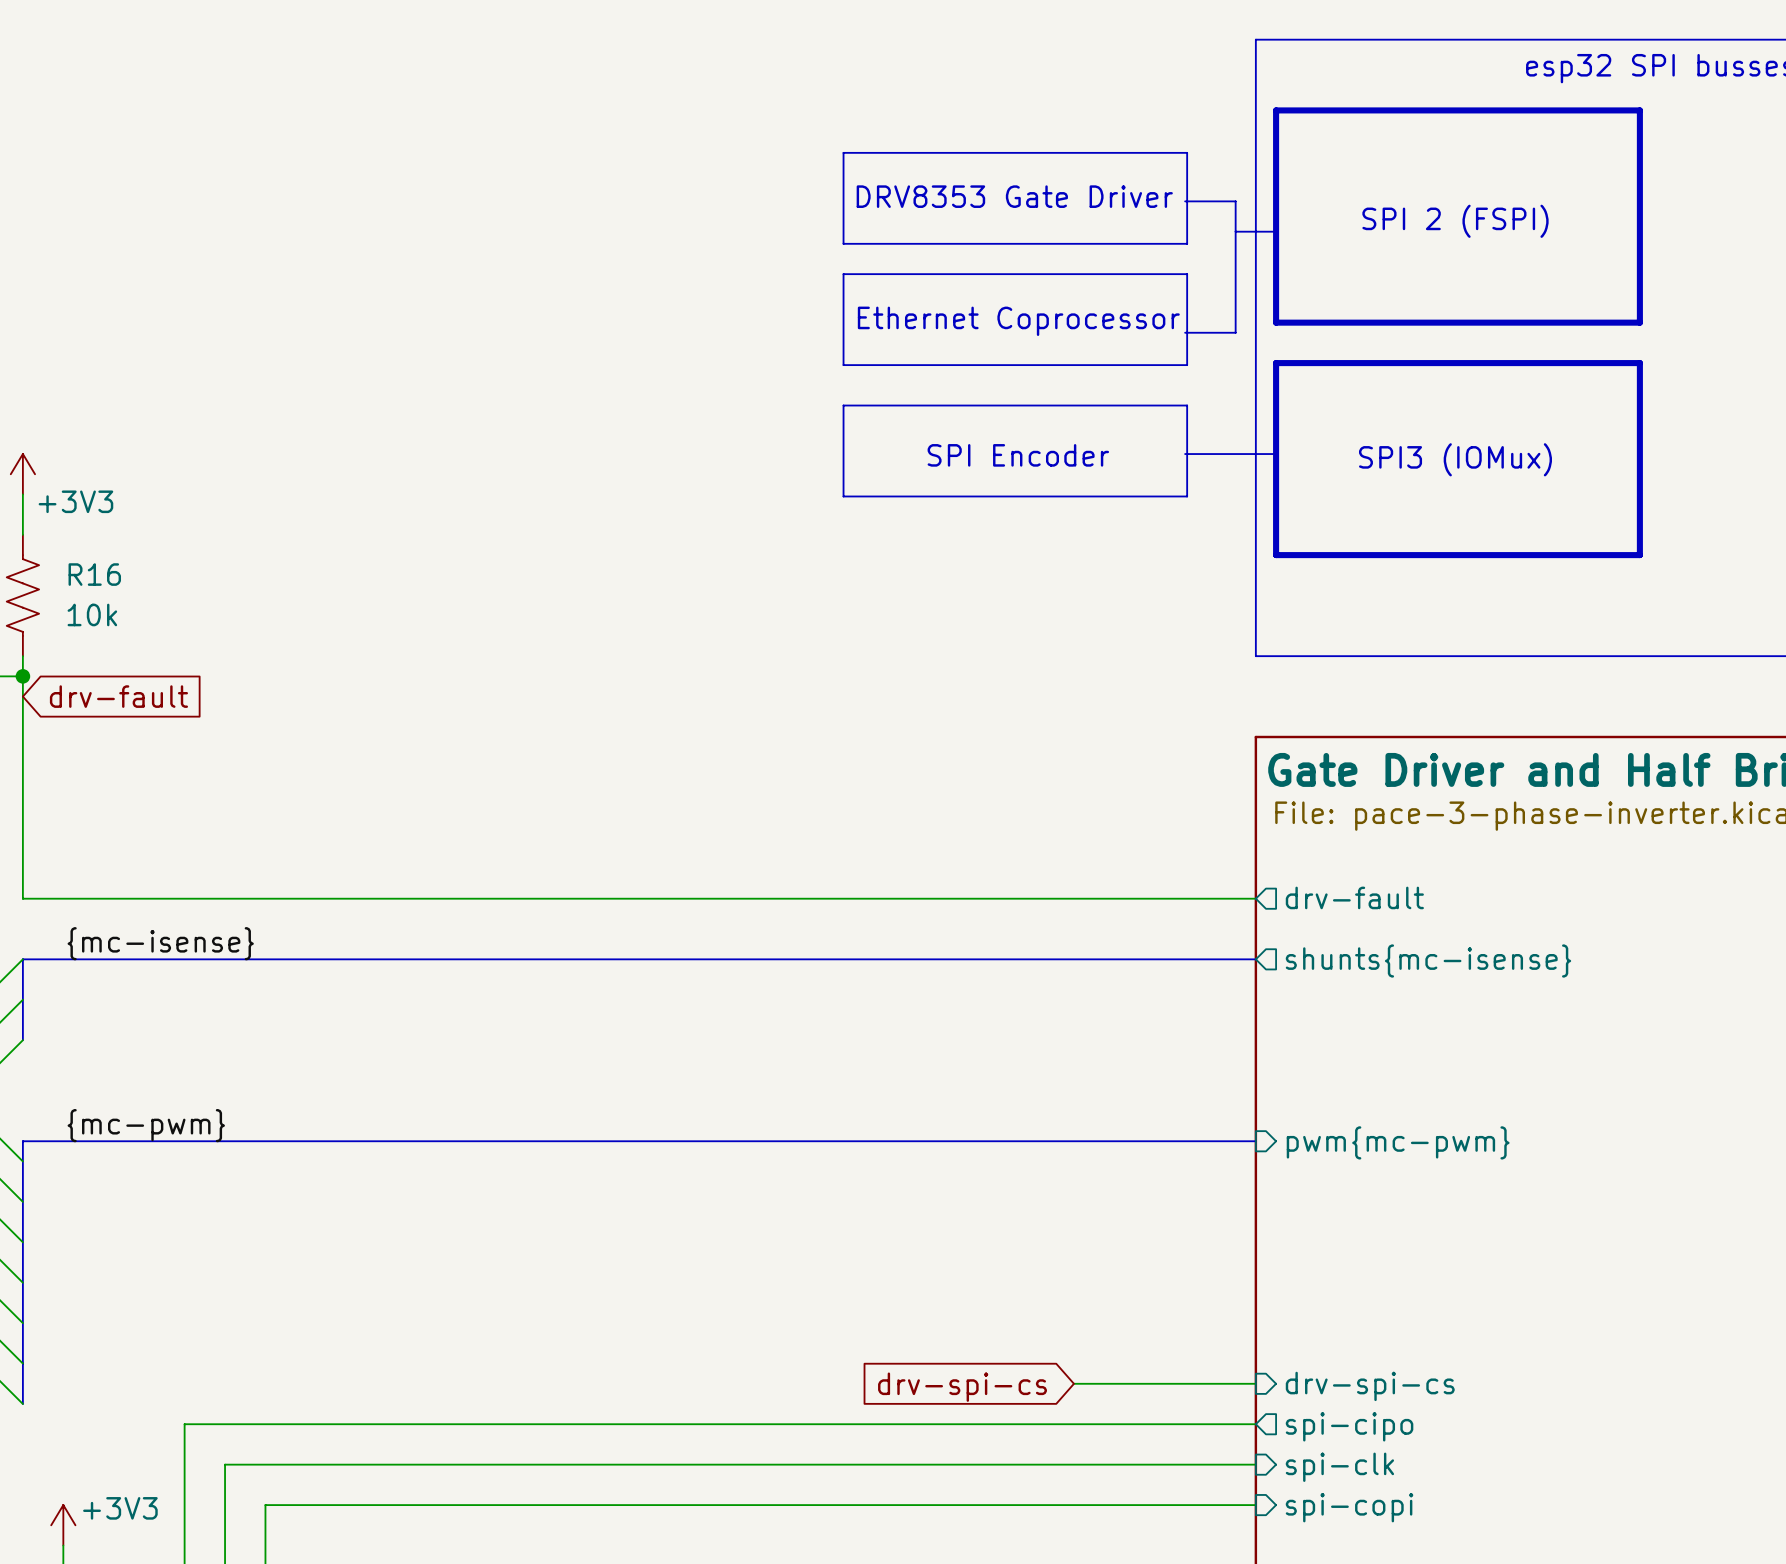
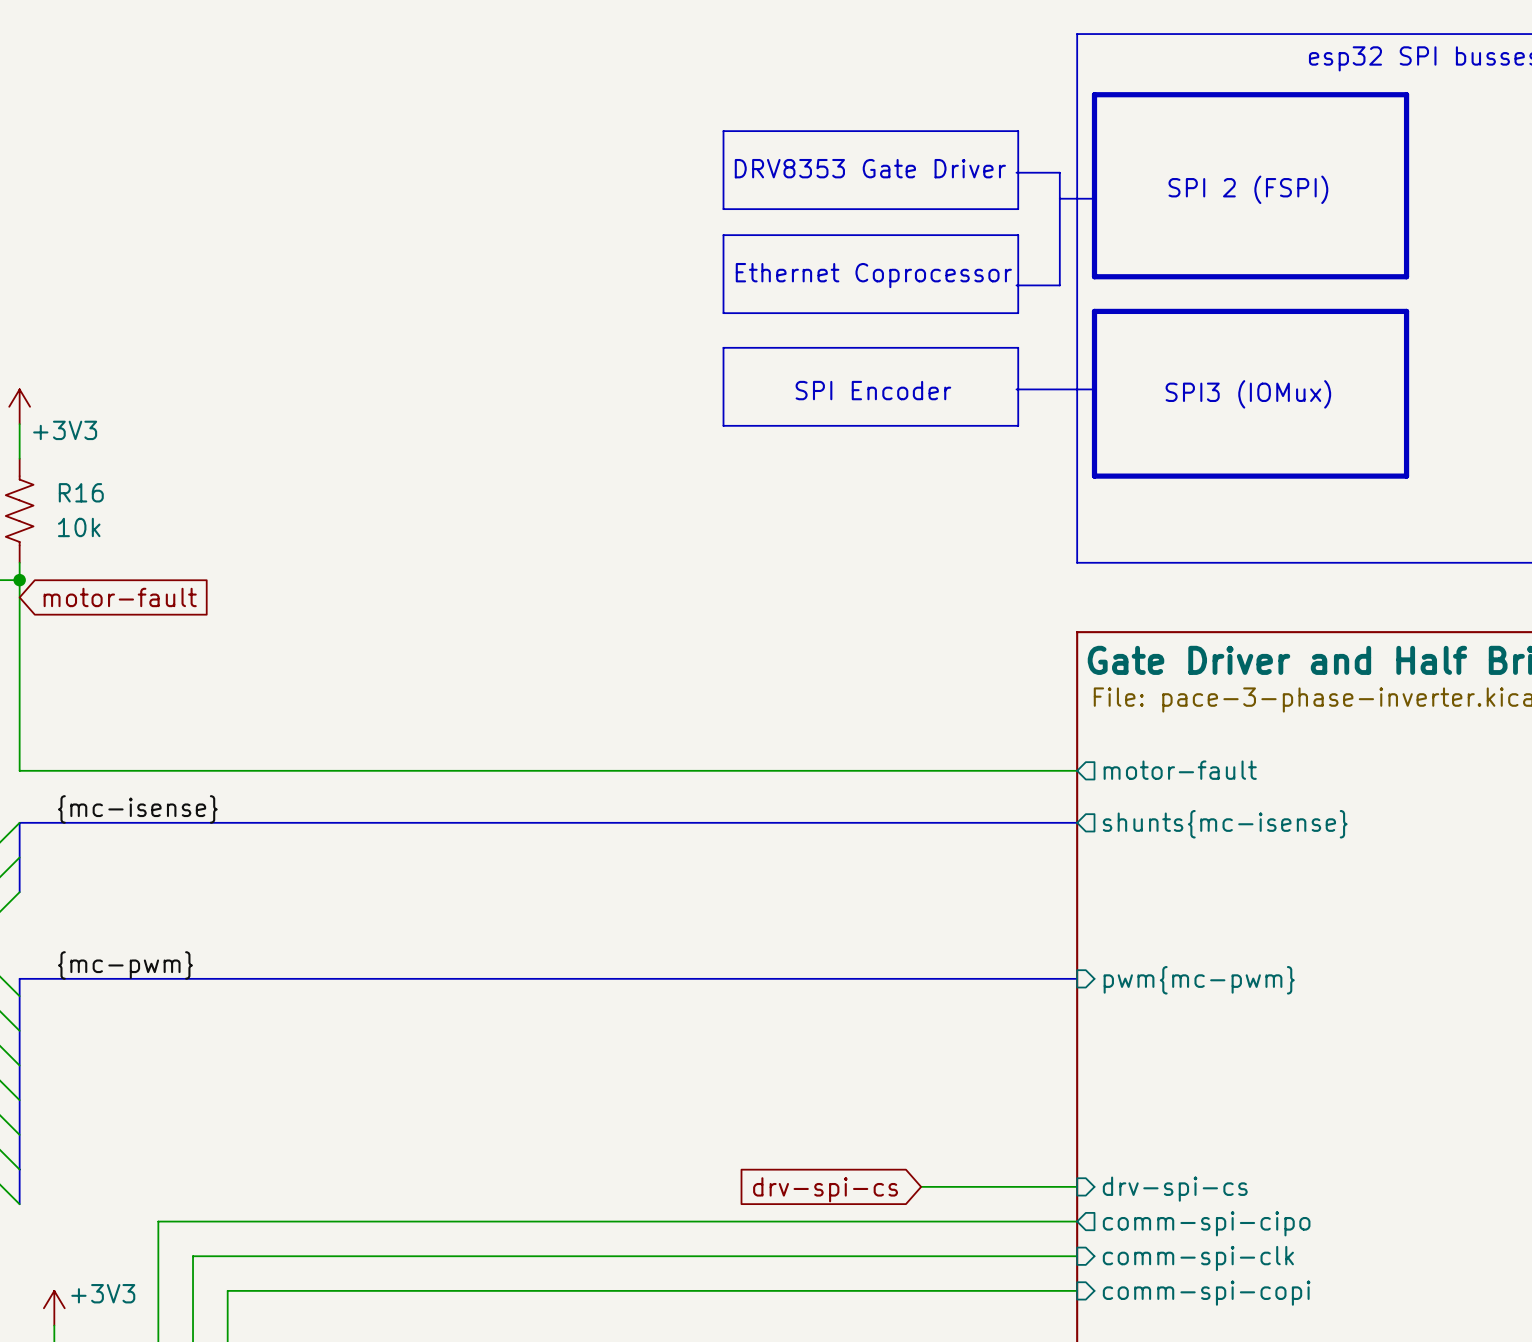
global label: drv-fault (118, 696) -> motor-fault (120, 597)
sheet pin: drv-fault (1354, 897) -> motor-fault (1180, 770)
sheet pin: spi-cipo (1349, 1426) -> comm-spi-cipo (1206, 1223)
sheet pin: spi-clk (1339, 1467) -> comm-spi-clk (1198, 1258)
sheet pin: spi-copi (1349, 1507) -> comm-spi-copi (1206, 1293)

